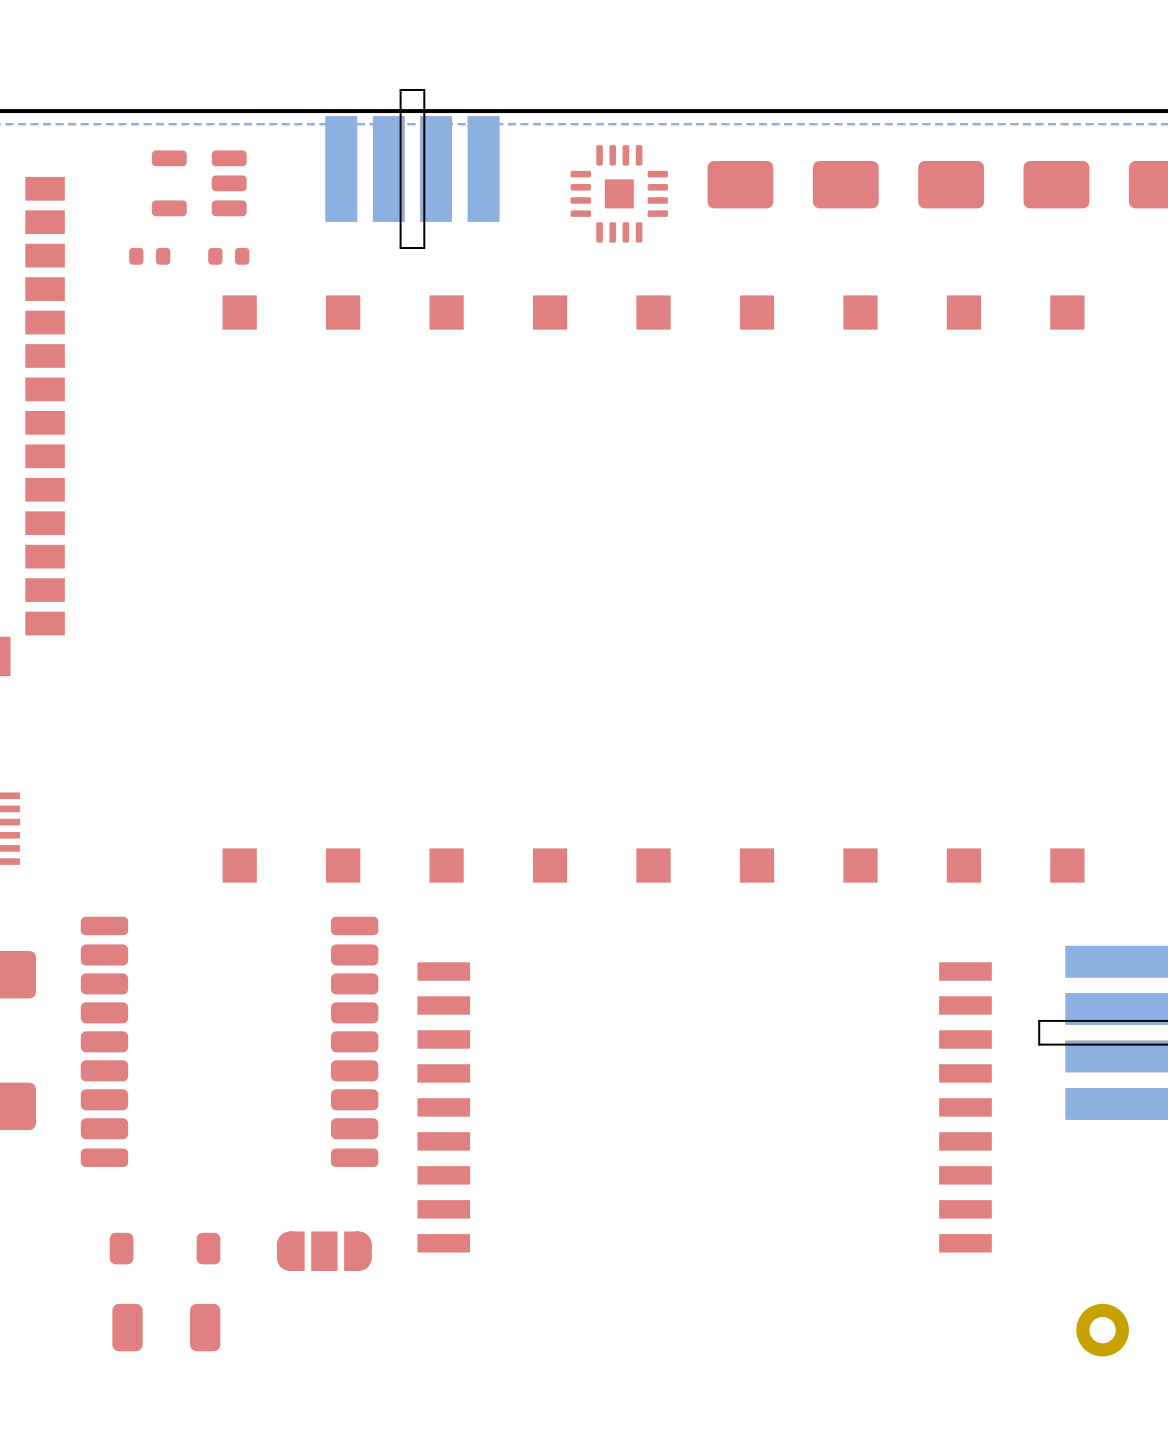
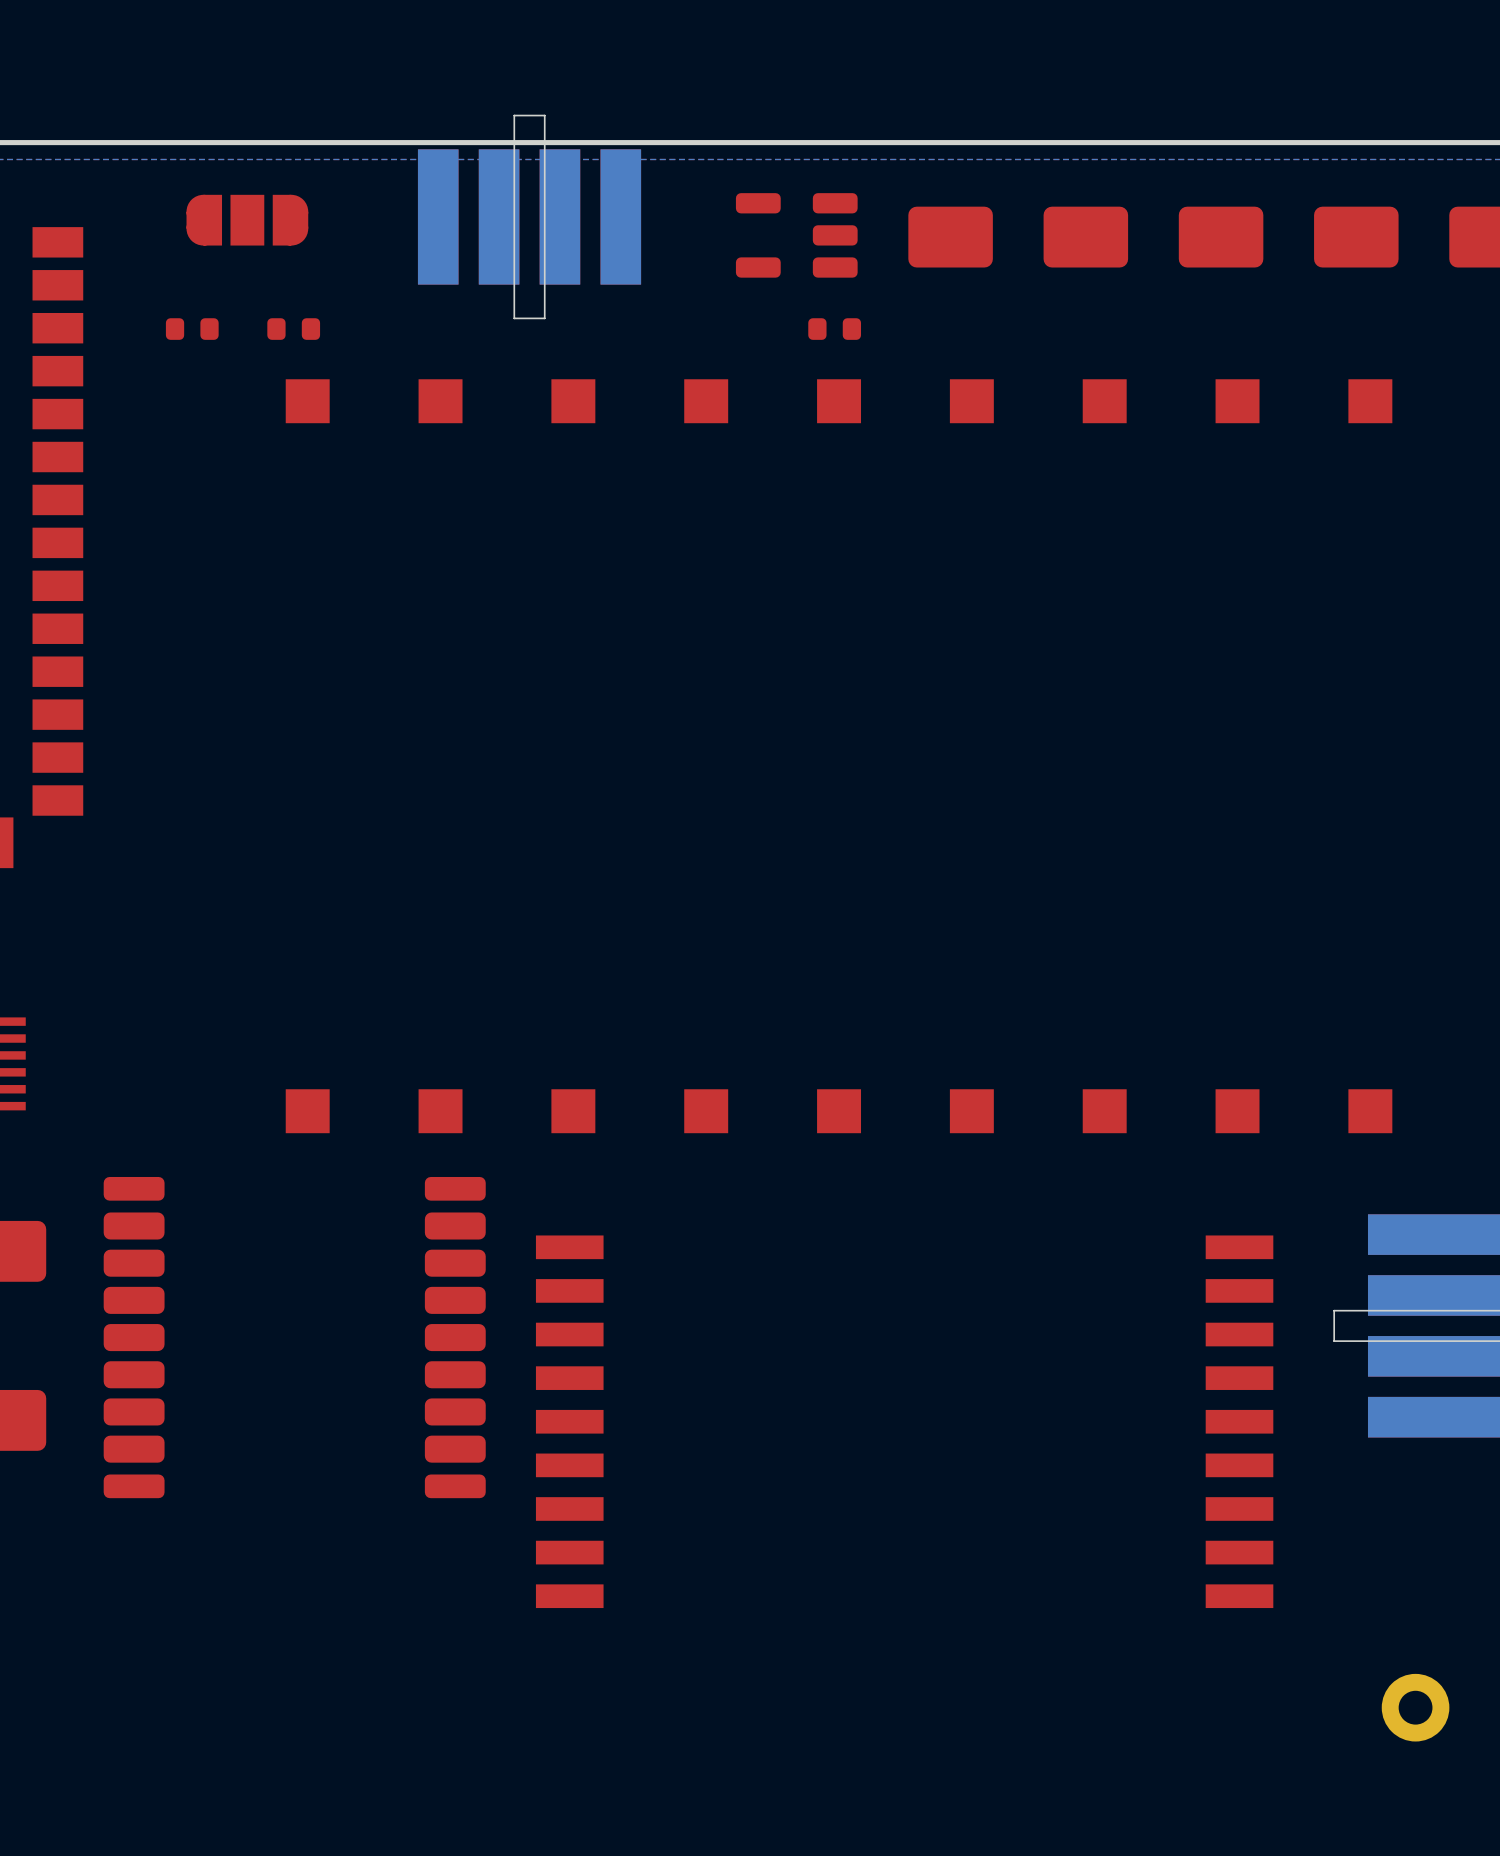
part footprint: [570, 145, 669, 243] -> [735, 193, 858, 278]
part footprint: [151, 150, 247, 217] -> [186, 194, 309, 246]
part: none -> (834, 329)
part: (165, 1248) -> none
part: (324, 1251) -> none
part: (166, 1327) -> none

